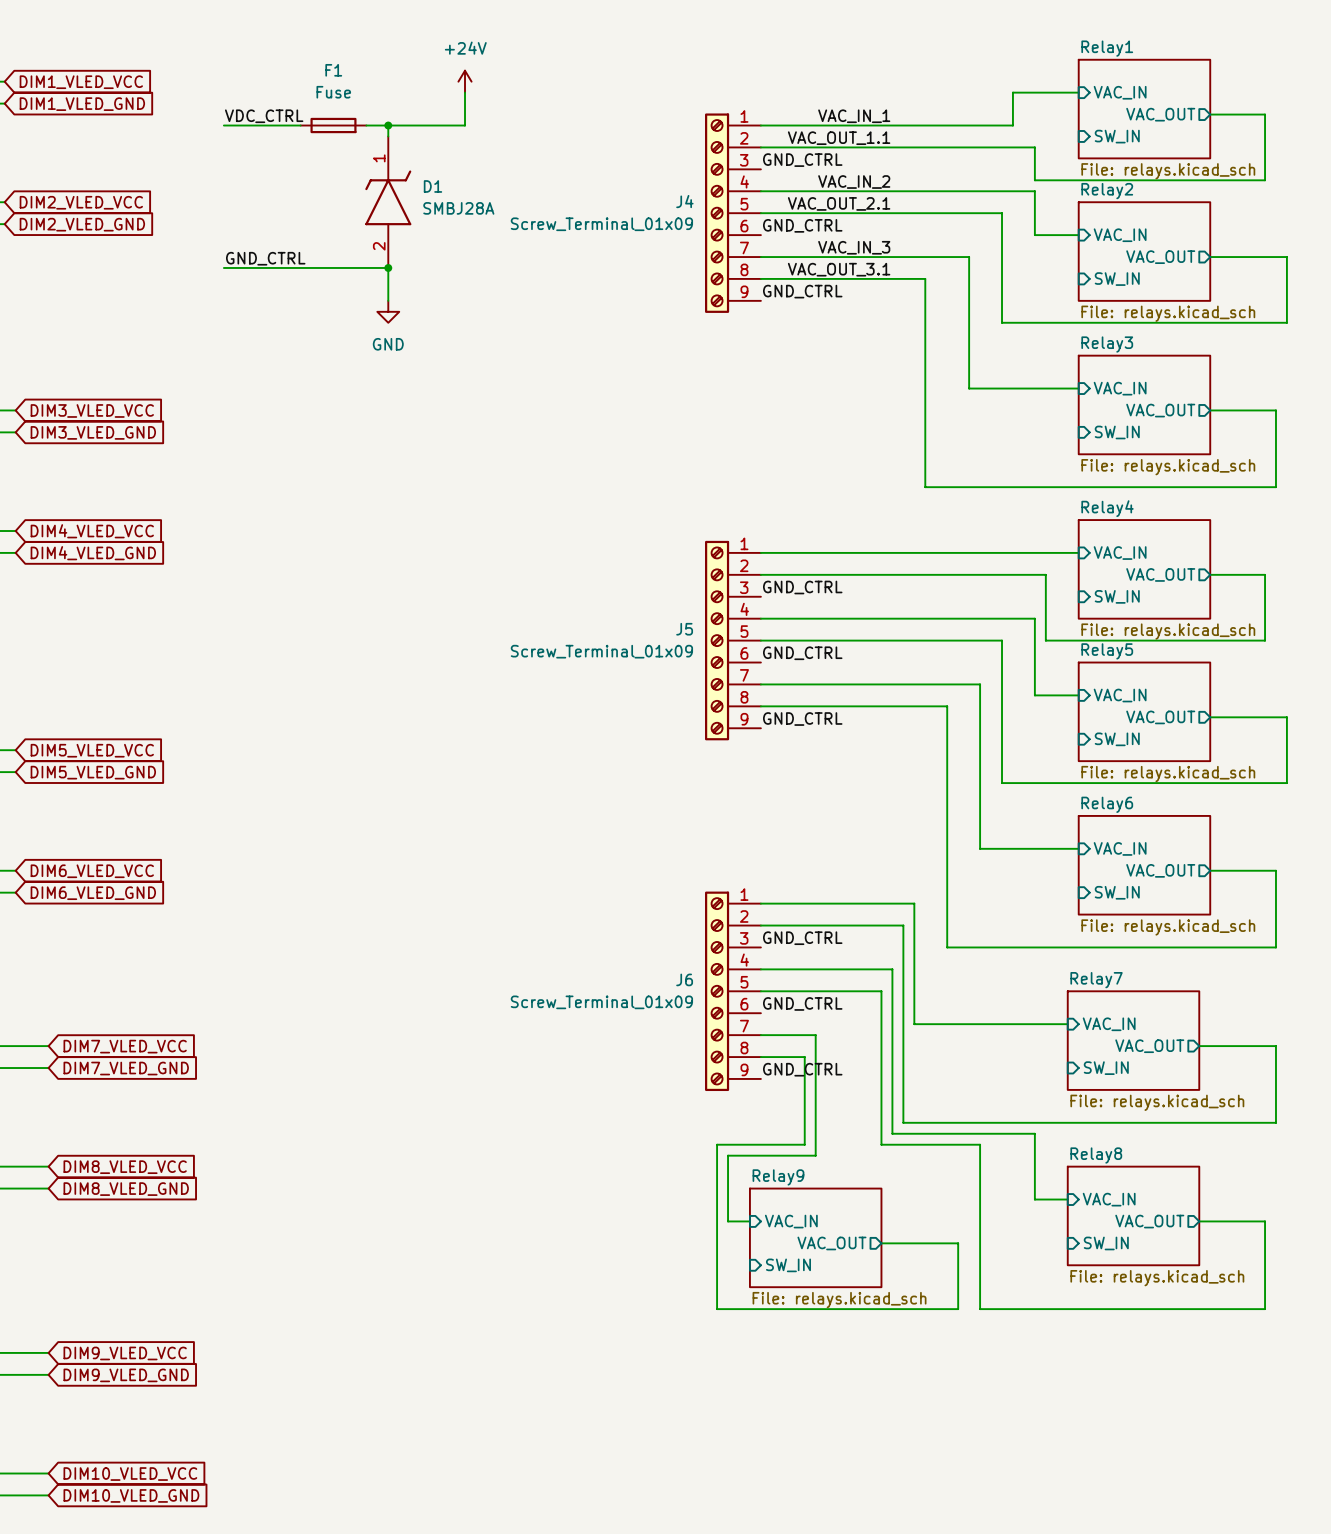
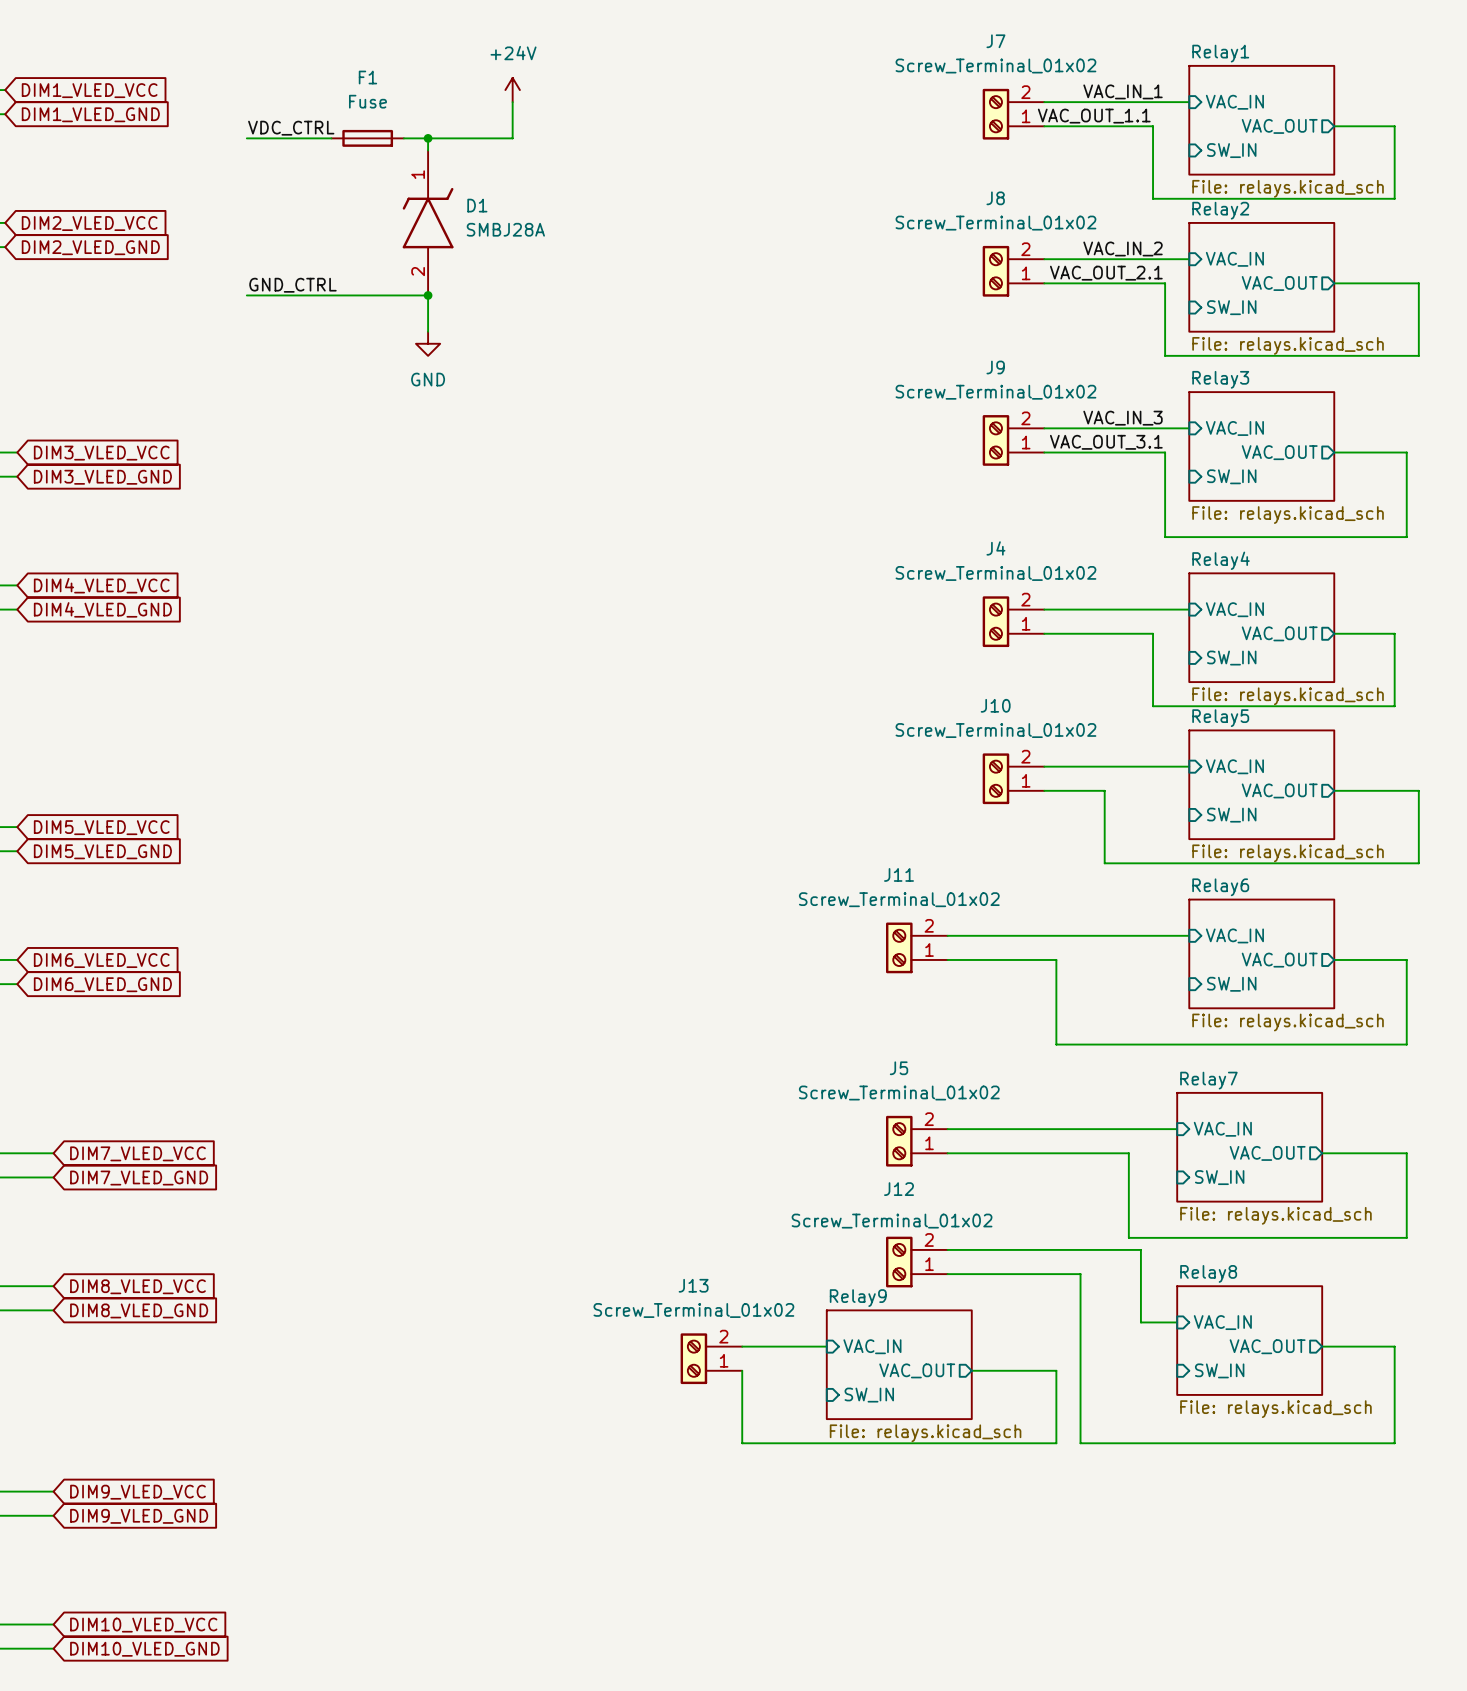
wire: (1012, 92) (1012, 125) (760, 125) -> (1116, 102) (1044, 102)
J7: none -> Screw_Terminal_01x02 (1013, 114)
J4 symbol: [705, 113, 761, 313] -> [982, 596, 1045, 648]
label position: VAC_IN_1 (854, 116) -> VAC_IN_1 (1123, 91)
label position: VAC_OUT_1.1 (839, 138) -> VAC_OUT_1.1 (1094, 116)
wire: (760, 147) (1034, 147) (1034, 180) (1045, 180) -> (1044, 126) (1153, 126) (1153, 198)
label: GND_CTRL (802, 160) -> none
label position: VAC_IN_2 (854, 182) -> VAC_IN_2 (1123, 248)
wire: (760, 191) (1034, 191) (1034, 235) -> (1044, 259) (1140, 259)
J4 name position: J4 (684, 201) -> J4 (995, 548)
label position: VAC_OUT_2.1 (839, 203) -> VAC_OUT_2.1 (1106, 273)
wire: (760, 213) (1002, 213) (1002, 322) (1056, 322) -> none
J4 value: Screw_Terminal_01x09 (601, 224) -> Screw_Terminal_01x02 (995, 573)
label: GND_CTRL (802, 225) -> none
J8: none -> Screw_Terminal_01x02 (1013, 271)
label position: VAC_IN_3 (854, 247) -> VAC_IN_3 (1123, 418)
wire: (760, 257) (947, 257) -> none
wire: (969, 257) (969, 388) -> (1068, 283) (1165, 283) (1165, 355)
label position: VAC_OUT_3.1 (839, 269) -> VAC_OUT_3.1 (1106, 442)
wire: (760, 278) (925, 278) (925, 487) (1056, 487) -> (1044, 452) (1165, 452) (1165, 537)
label: GND_CTRL (802, 291) -> none
wire: none -> (1044, 428) (1068, 428)
J9: none -> Screw_Terminal_01x02 (1013, 440)
J5 symbol: [705, 540, 761, 741] -> [886, 1115, 948, 1167]
wire: (760, 552) (947, 552) -> none
wire: (760, 574) (947, 574) -> none
label: GND_CTRL (802, 587) -> none
wire: (760, 618) (1034, 618) (1034, 695) -> (1044, 766) (1140, 766)
J5 name position: J5 (684, 629) -> J5 (899, 1068)
wire: (760, 640) (1002, 640) (1002, 717) -> (1044, 790) (1104, 790)
J5 value: Screw_Terminal_01x09 (601, 651) -> Screw_Terminal_01x02 (899, 1093)
label: GND_CTRL (802, 653) -> none
wire: (760, 684) (980, 684) (980, 848) -> (947, 935) (1080, 935)
wire: (760, 706) (947, 706) (947, 947) (958, 947) -> (947, 959) (1056, 959) (1056, 1044)
J10: none -> Screw_Terminal_01x02 (1013, 778)
label: GND_CTRL (802, 719) -> none
J11: none -> Screw_Terminal_01x02 (916, 947)
wire: (760, 903) (914, 903) (914, 1024) -> (947, 1129) (1008, 1129)
wire: (760, 925) (903, 925) (903, 1122) (1023, 1122) -> (947, 1153) (1128, 1153) (1128, 1237)
label: GND_CTRL (802, 938) -> none
wire: (760, 969) (892, 969) (892, 1133) -> (947, 1249) (983, 1249)
J6: Screw_Terminal_01x09 (732, 991) -> none
wire: (760, 991) (881, 991) (881, 1144) (980, 1144) (980, 1155) -> (947, 1274) (1080, 1274)
label: GND_CTRL (802, 1003) -> none
wire: (760, 1035) (815, 1035) (815, 1155) (728, 1155) (728, 1221) -> (742, 1346) (802, 1346)
wire: (760, 1057) (804, 1057) (804, 1144) (717, 1144) (717, 1309) -> (742, 1370) (742, 1443) (790, 1443)
label: GND_CTRL (802, 1069) -> none
J12: none -> Screw_Terminal_01x02 (916, 1262)
J13: none -> Screw_Terminal_01x02 (711, 1358)

